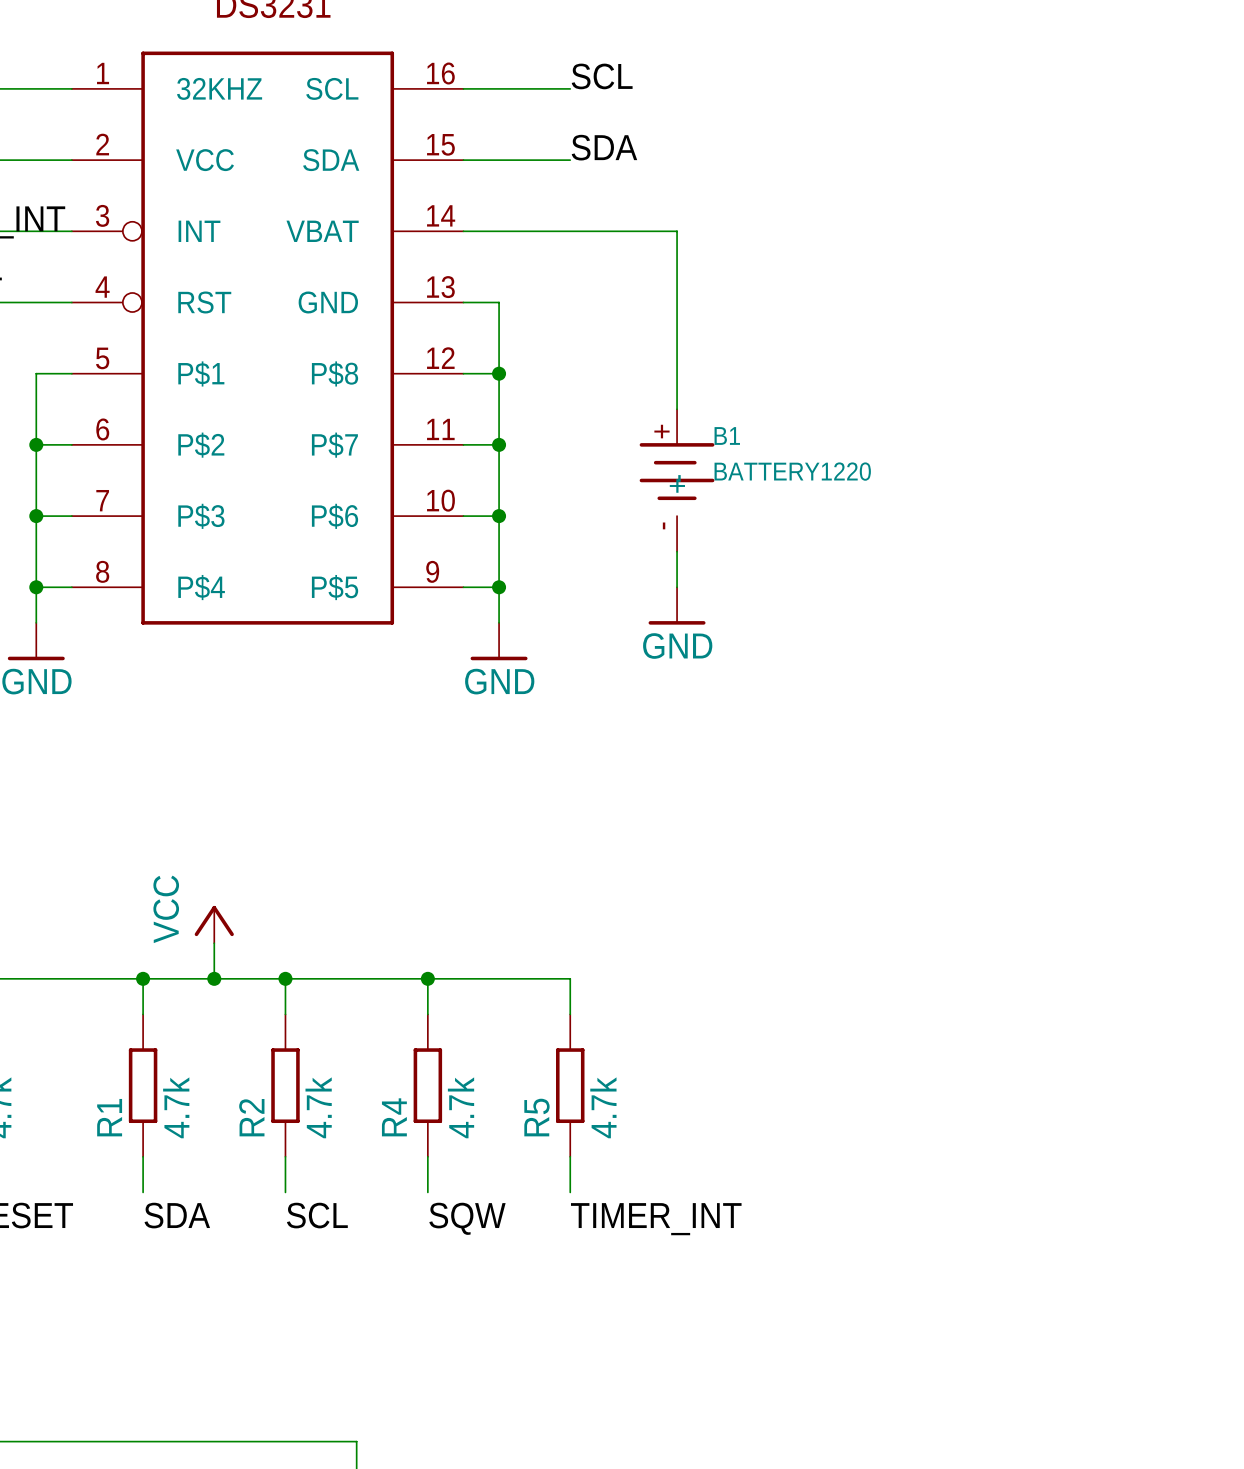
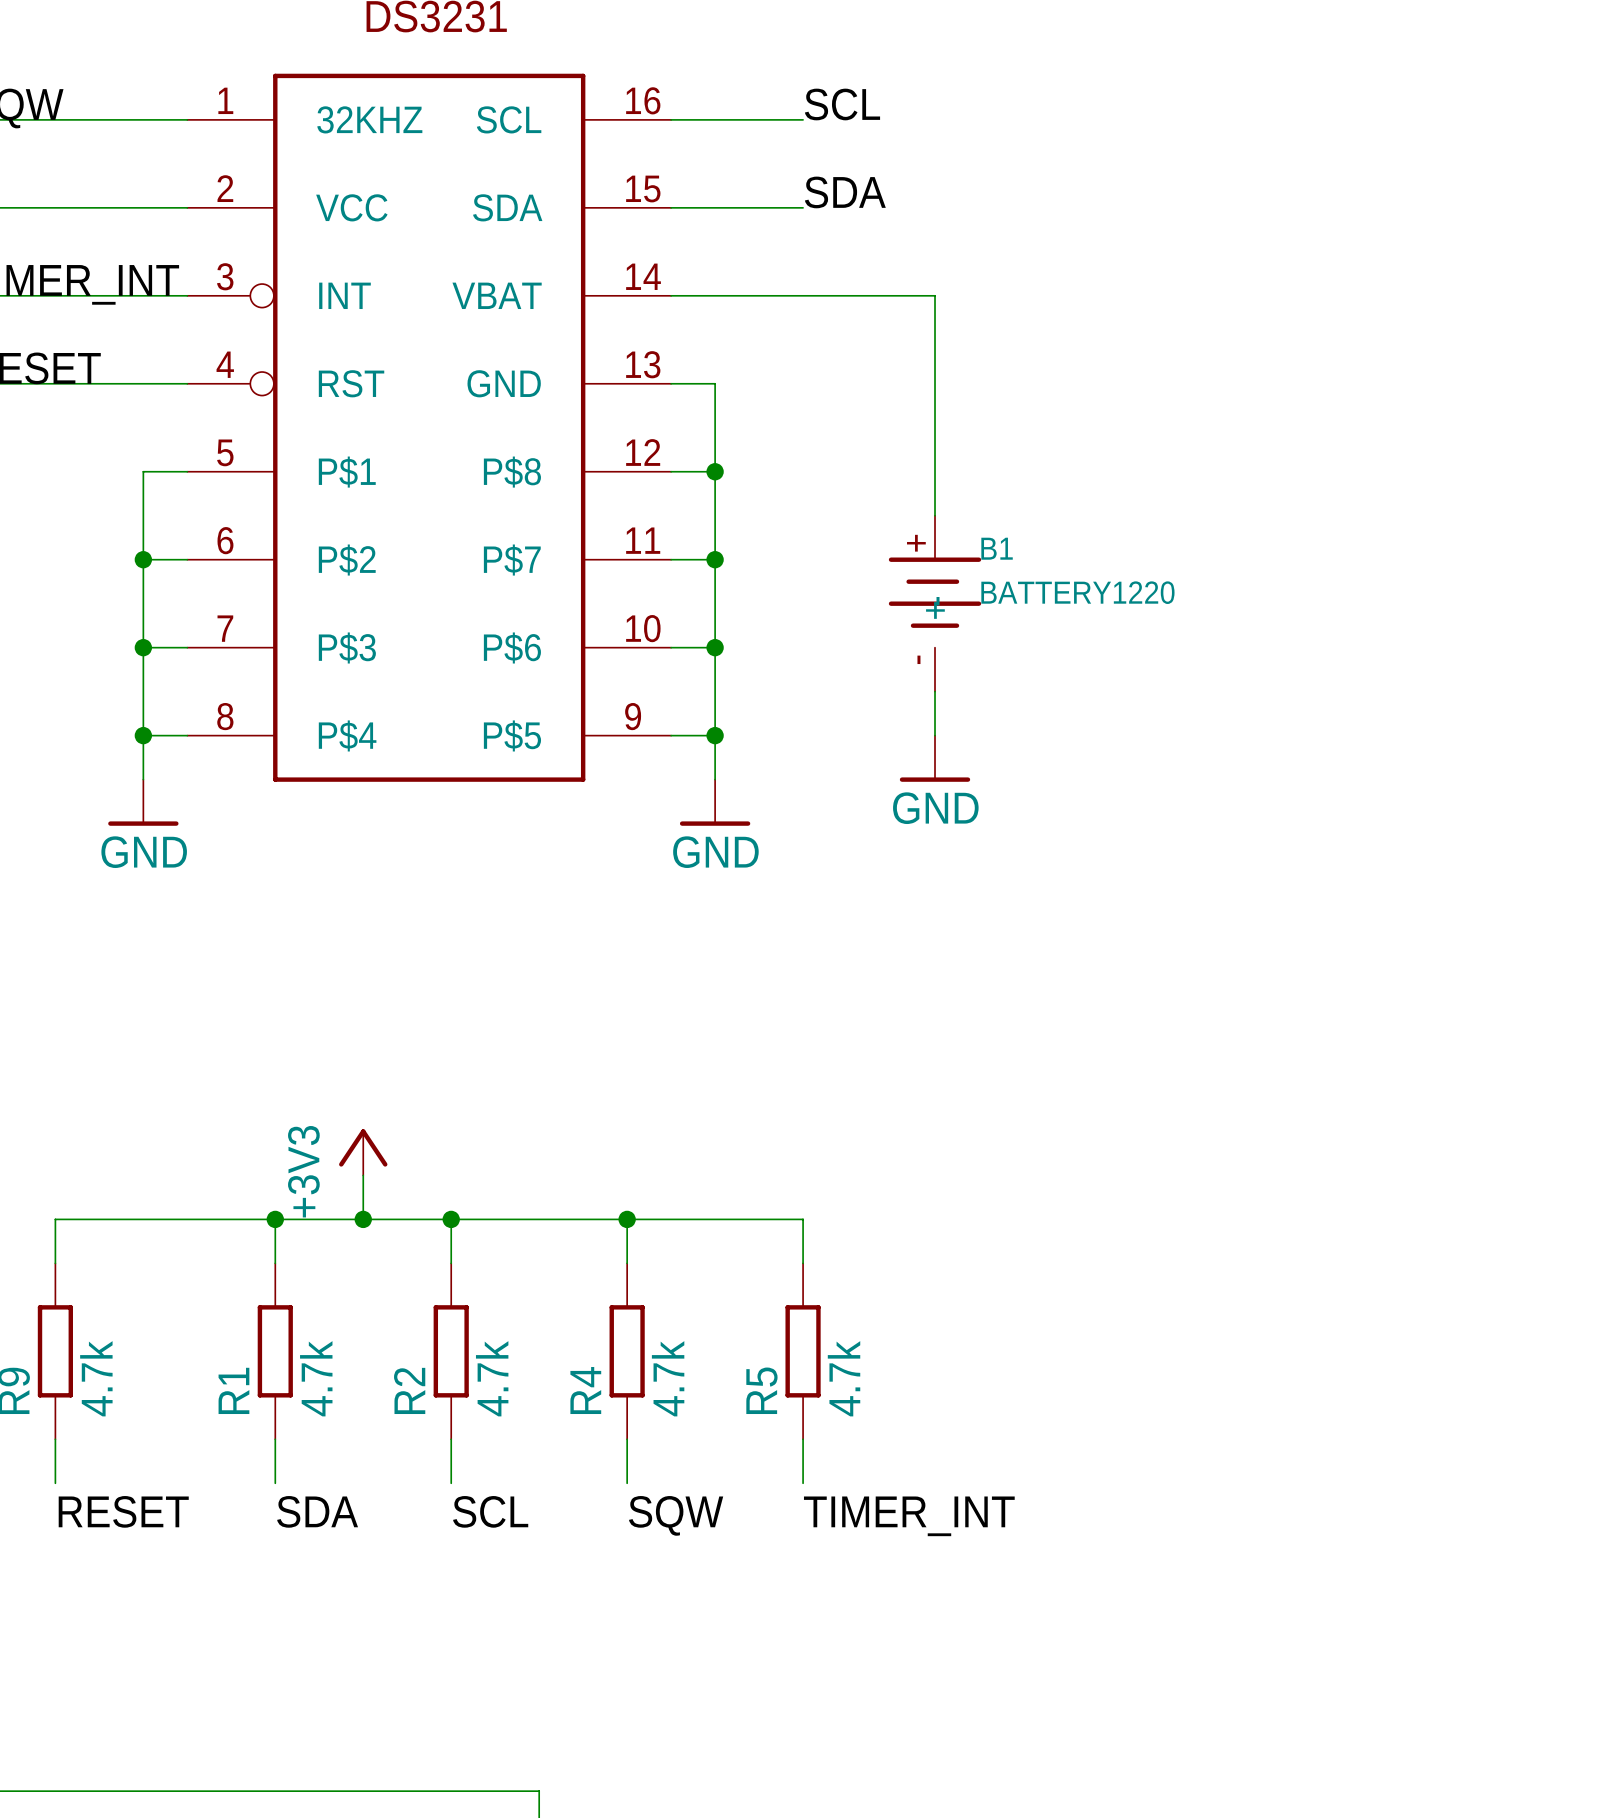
power symbol: VCC (214, 924) -> +3V3 (363, 1152)

